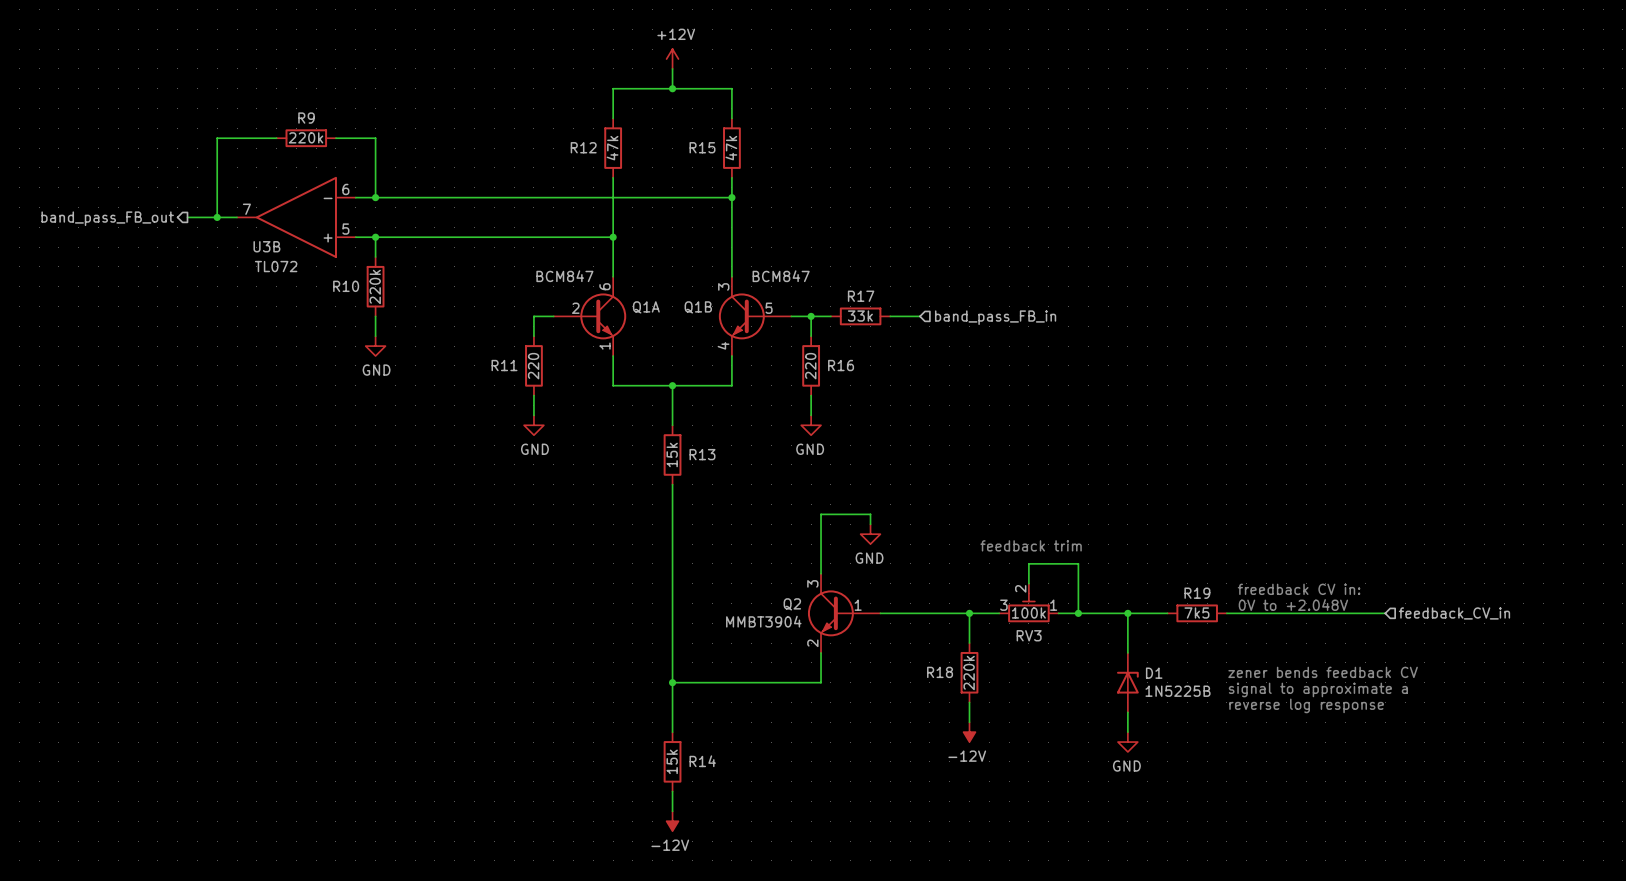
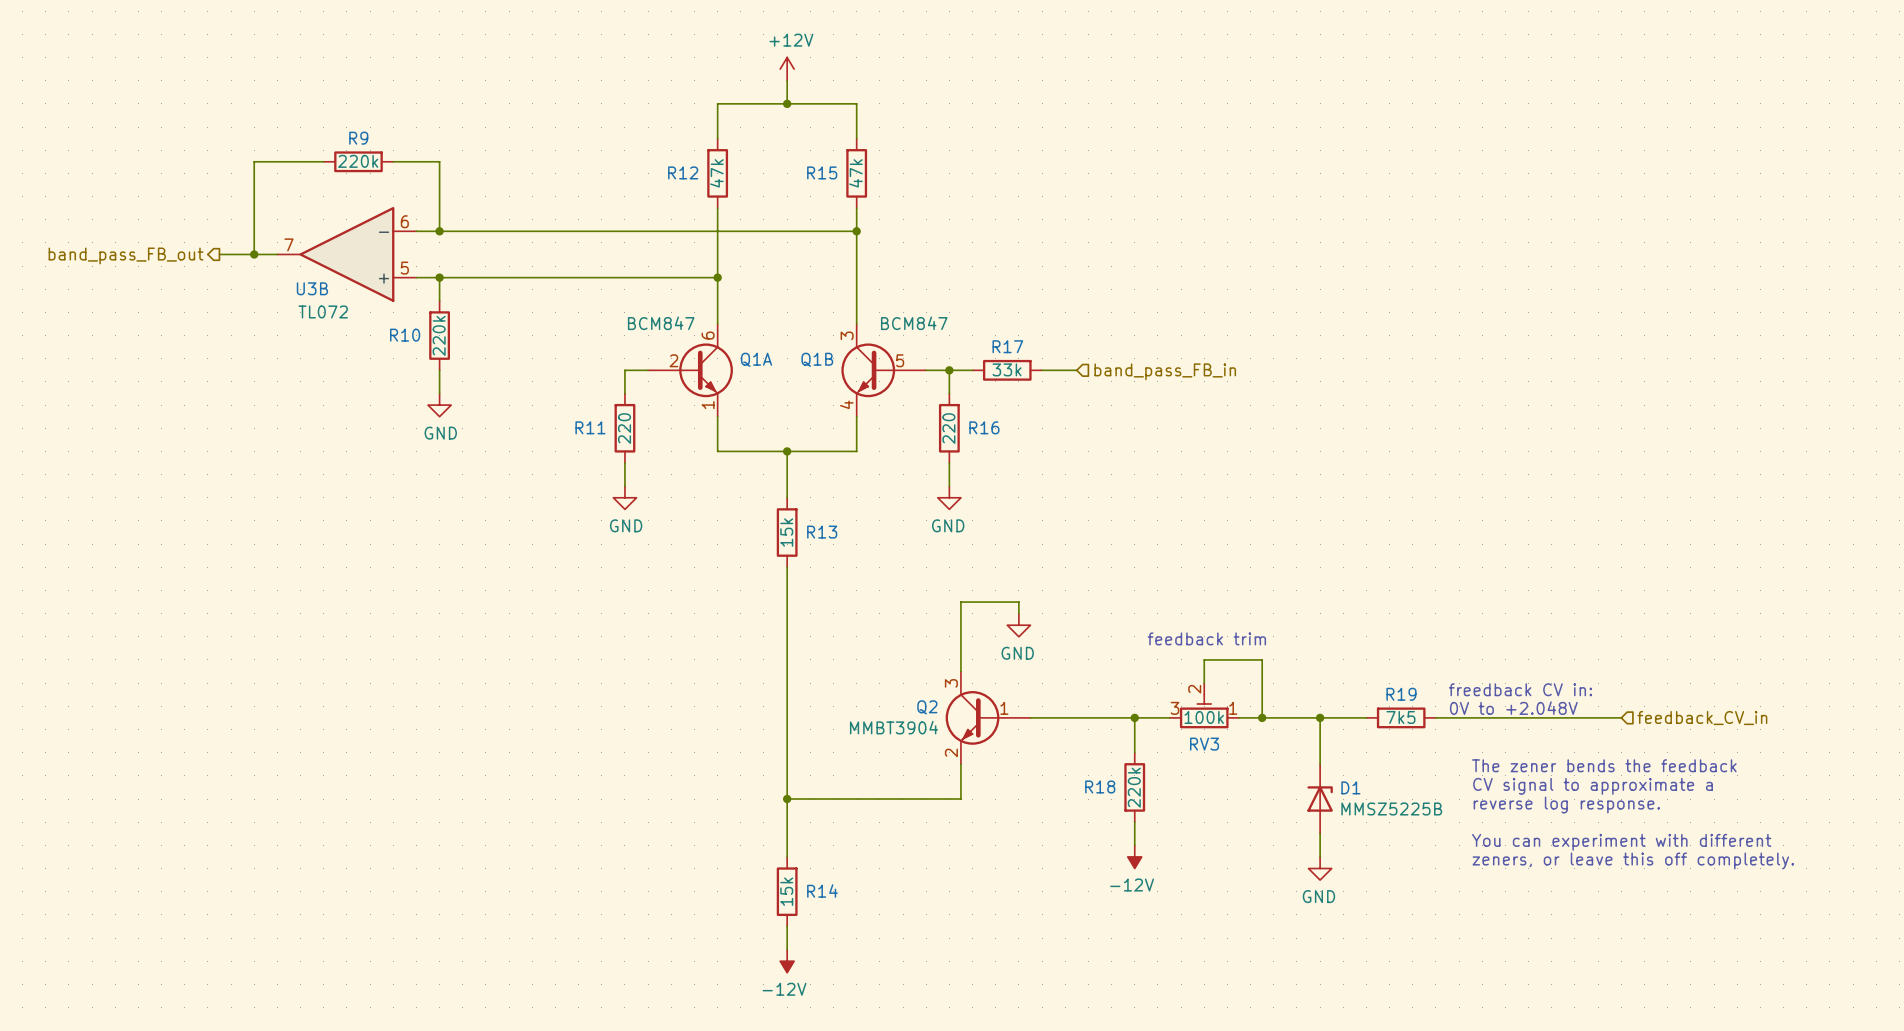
text: zener bends feedback CV (1323, 672) -> The zener bends the feedback (1604, 765)
text: signal to approximate a (1318, 689) -> CV signal to approximate a (1593, 786)
D1 value: 1N5225B (1178, 691) -> MMSZ5225B (1391, 809)
text: reverse log response (1306, 705) -> reverse log response. (1566, 805)
text: none -> You can experiment with different (1621, 842)
text: none -> zeners, or leave this off completely. (1633, 860)

